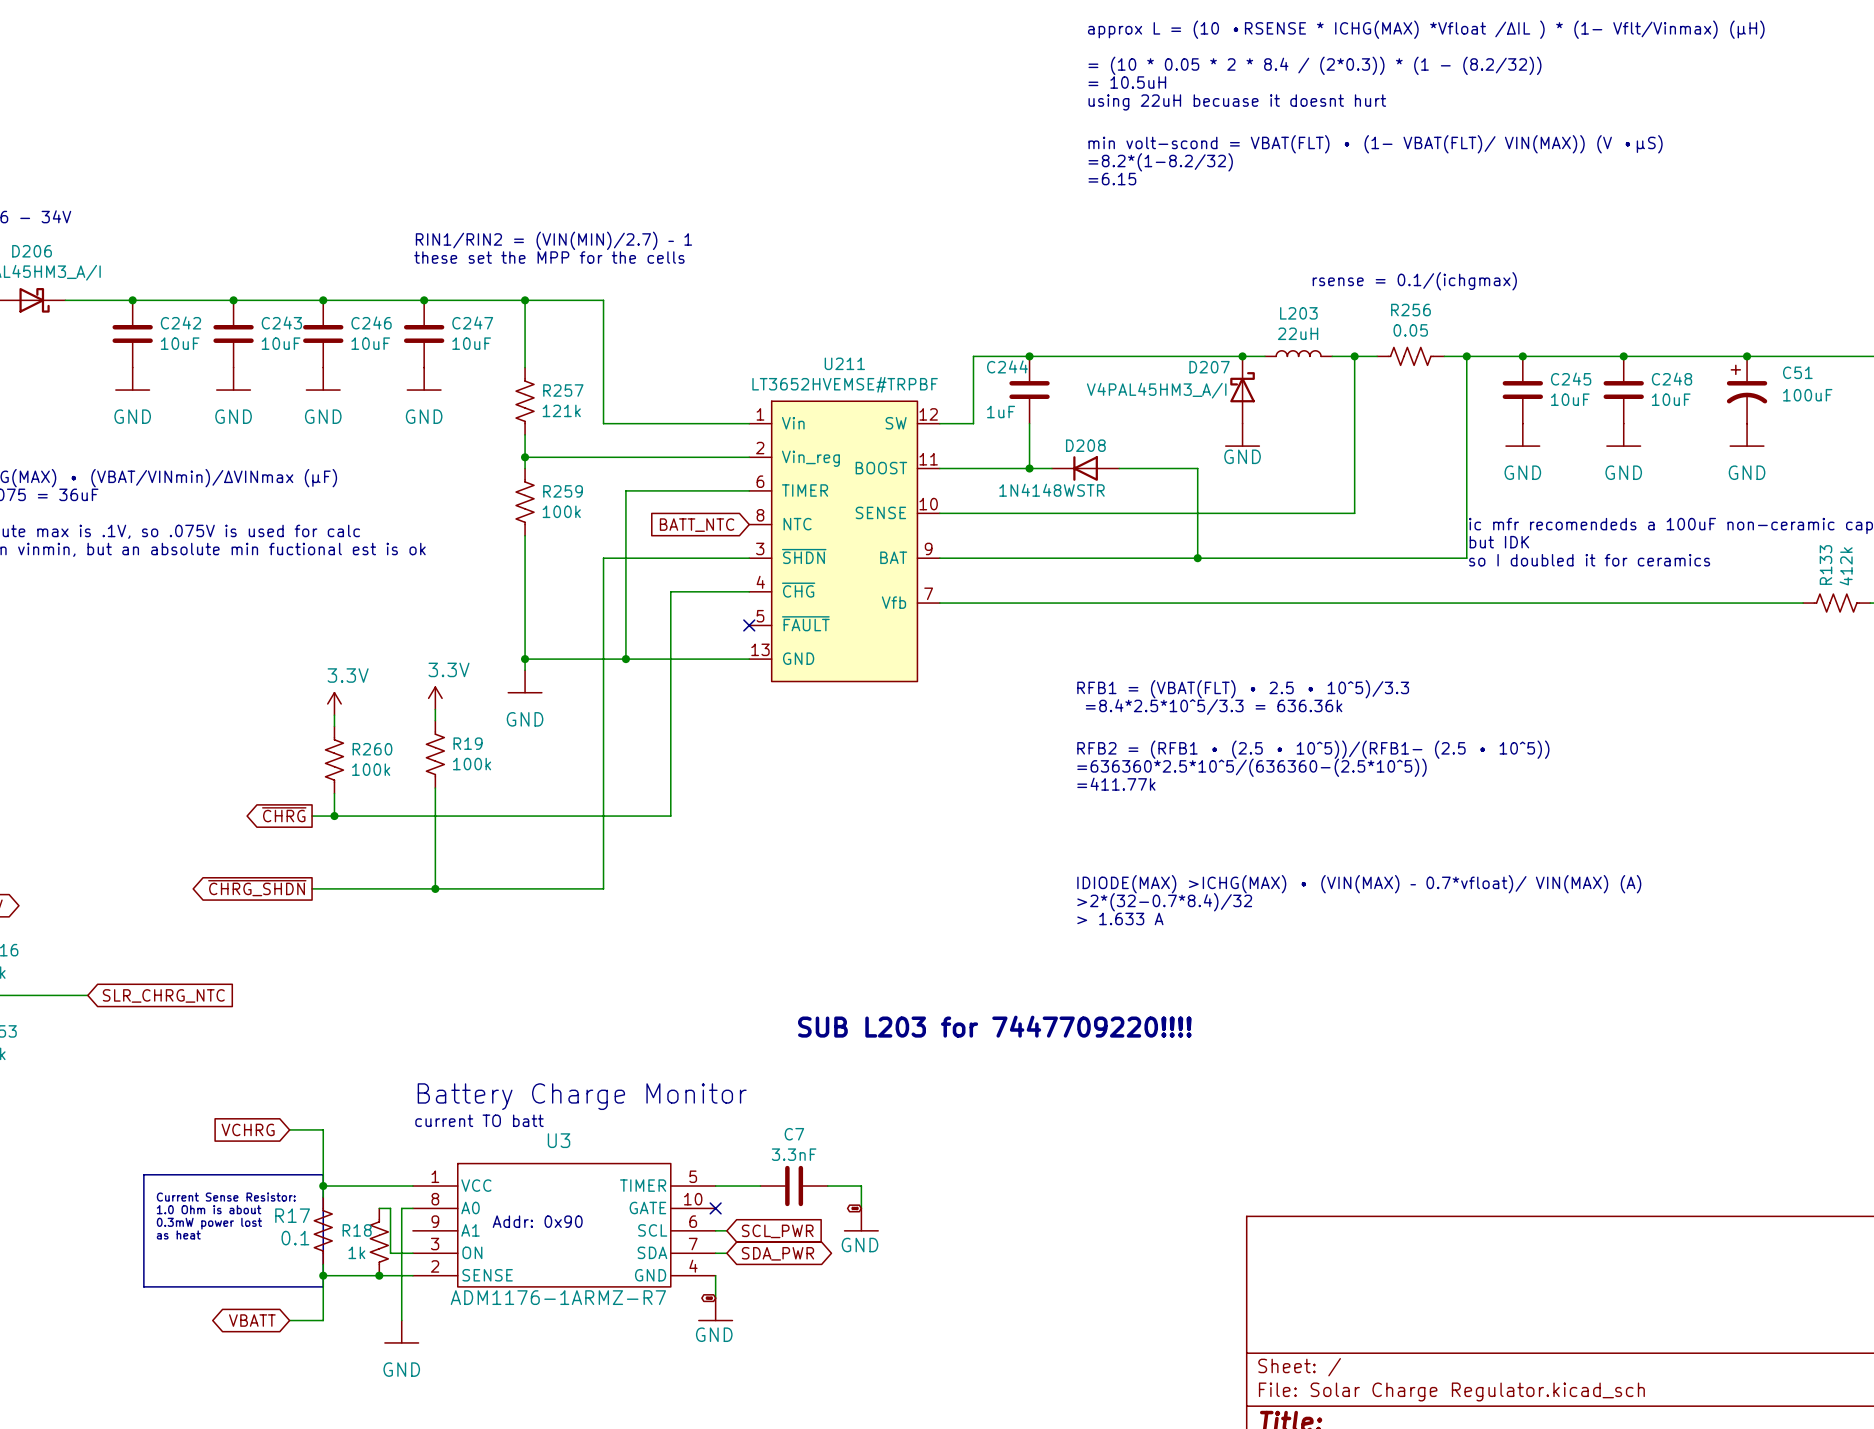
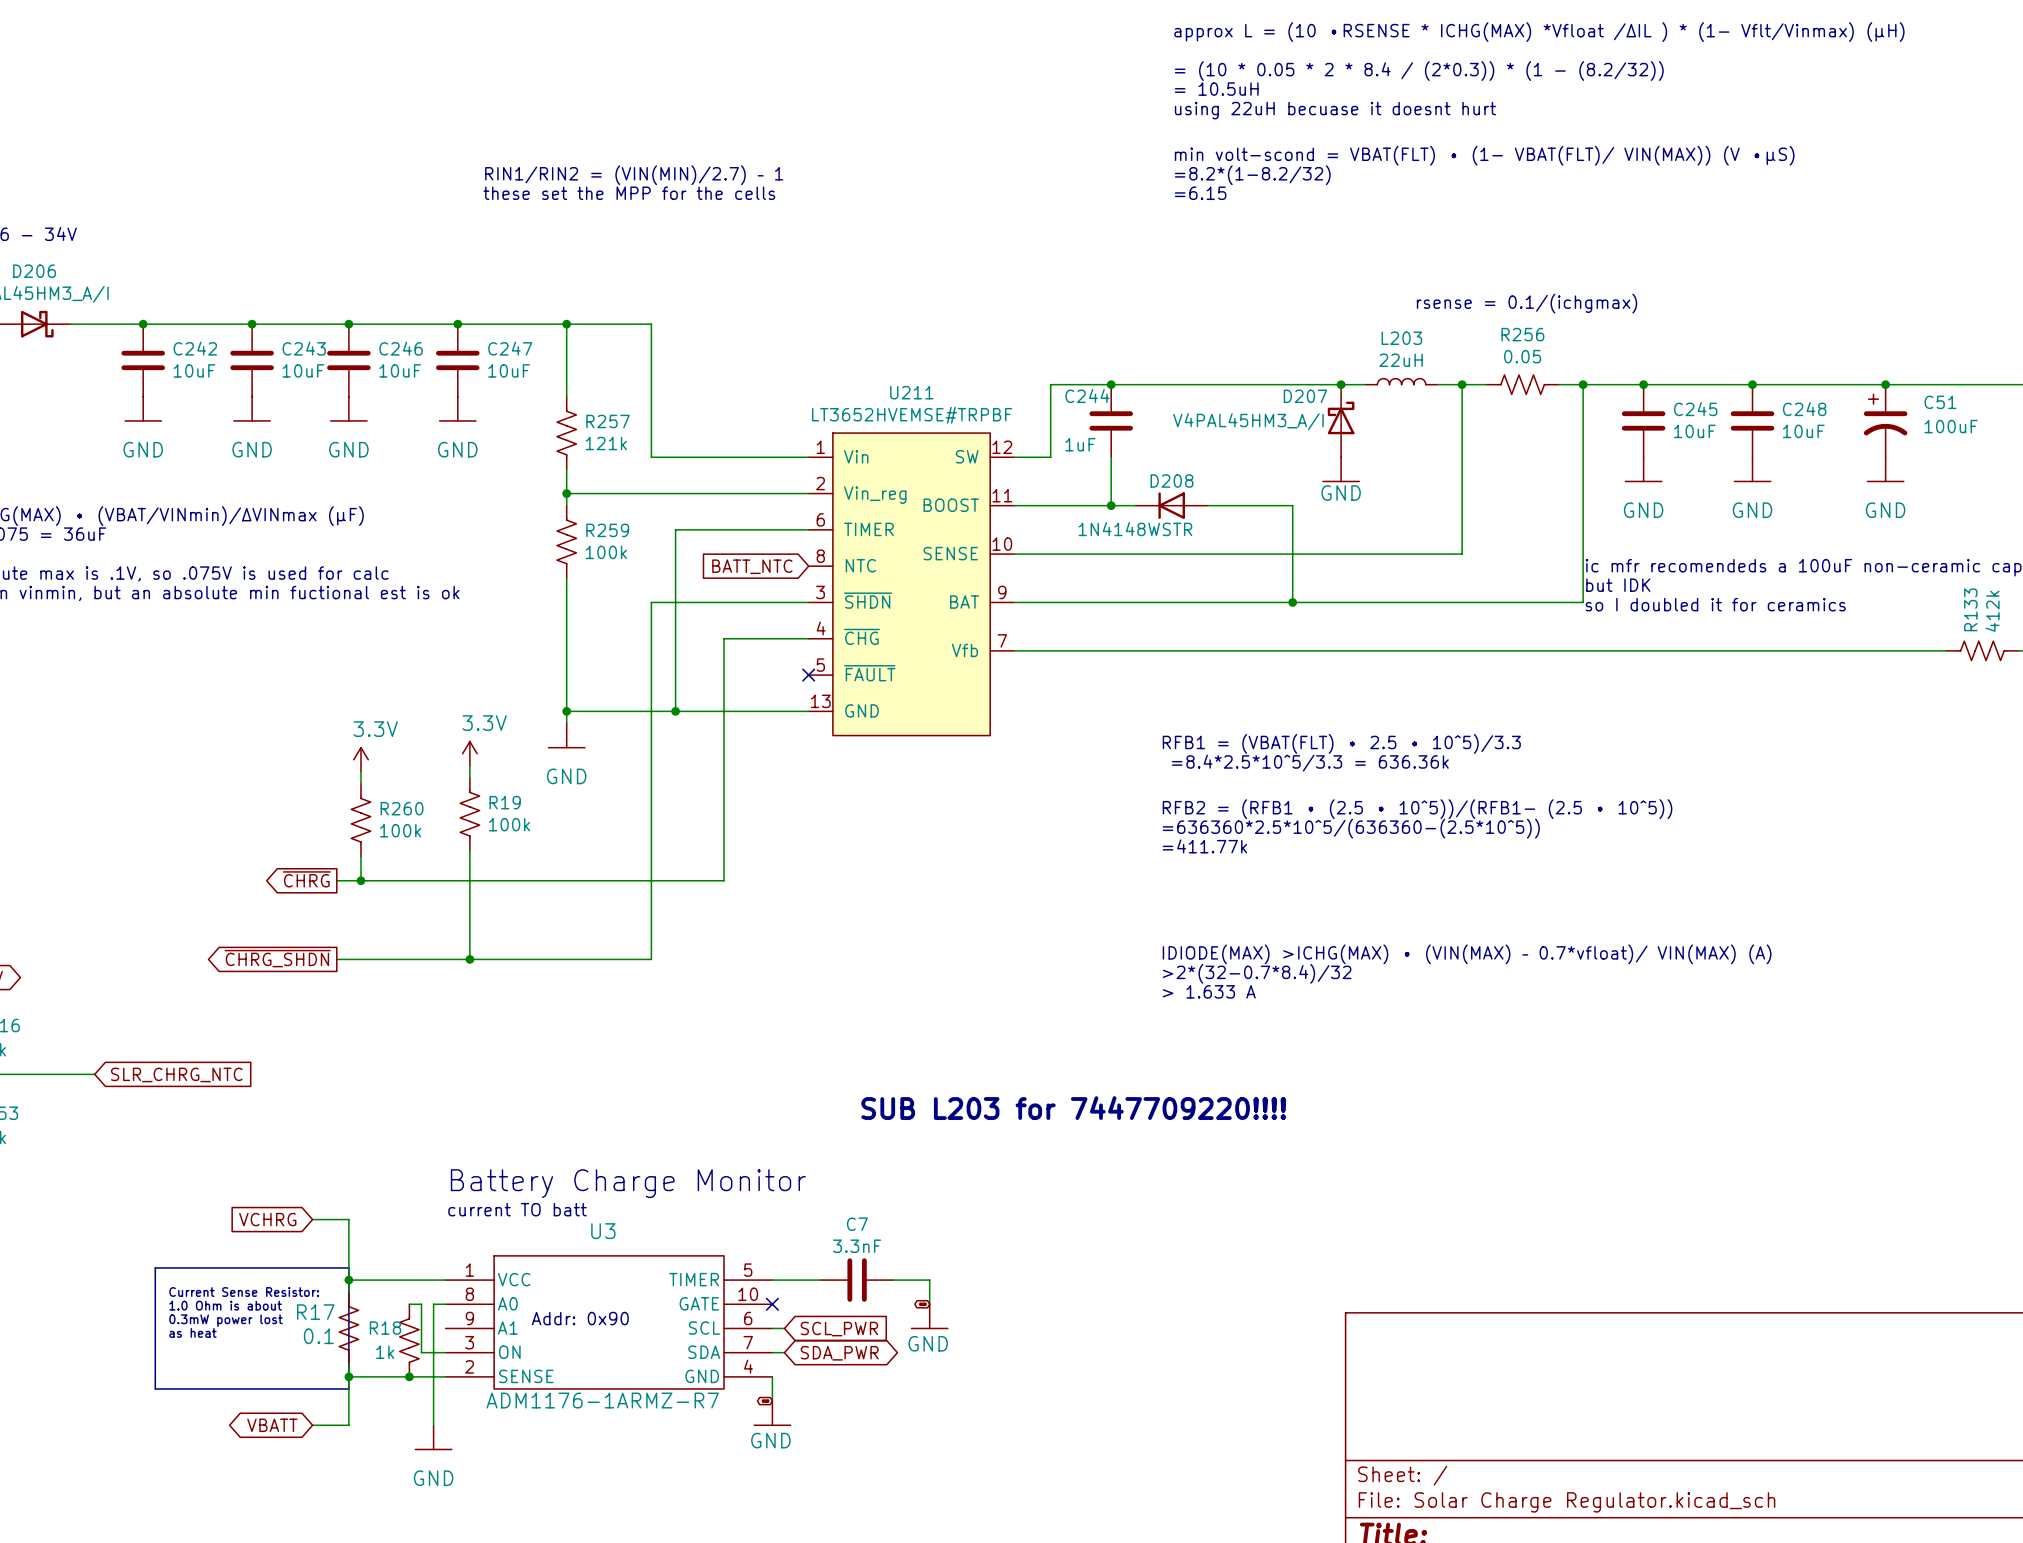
text position: RIN1/RIN2 = (VIN(MIN)/2.7) – 1 (553, 240) -> RIN1/RIN2 = (VIN(MIN)/2.7) – 1 (634, 175)
text position: these set the MPP for the cells (549, 257) -> these set the MPP for the cells (629, 193)

